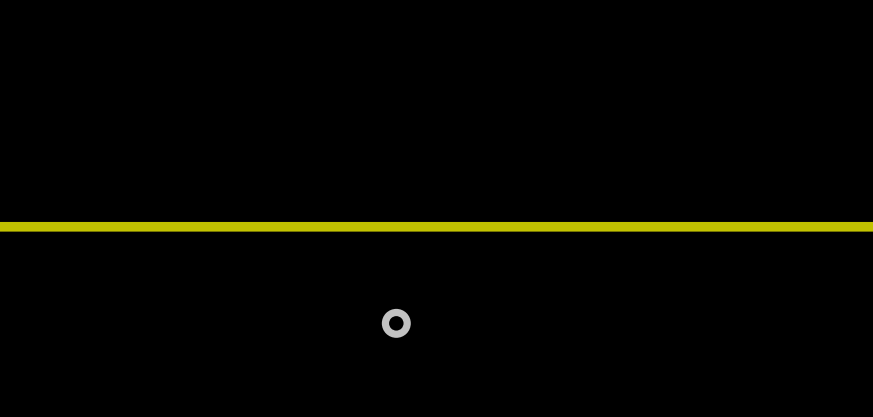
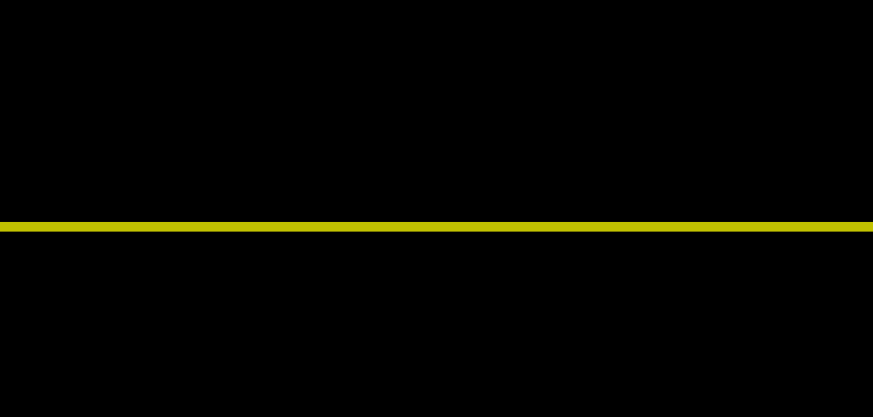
via: (396, 323) -> none

